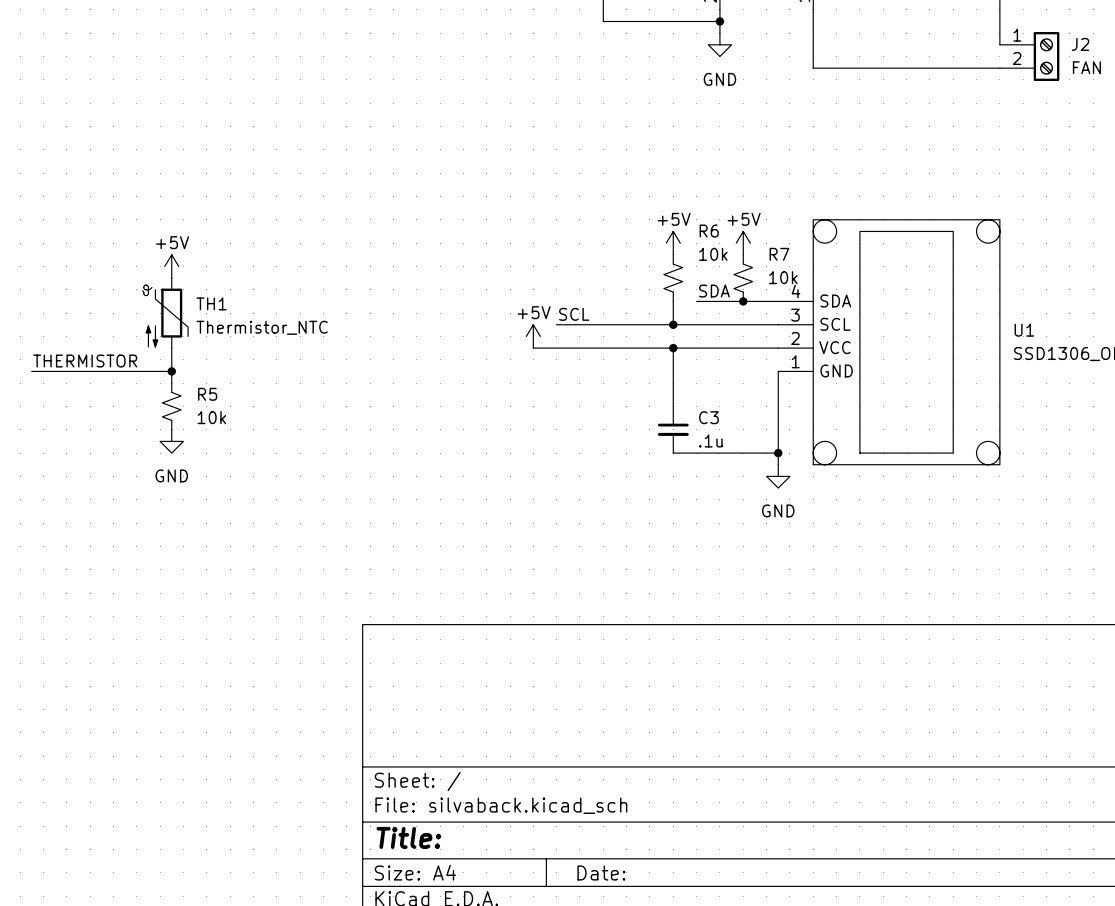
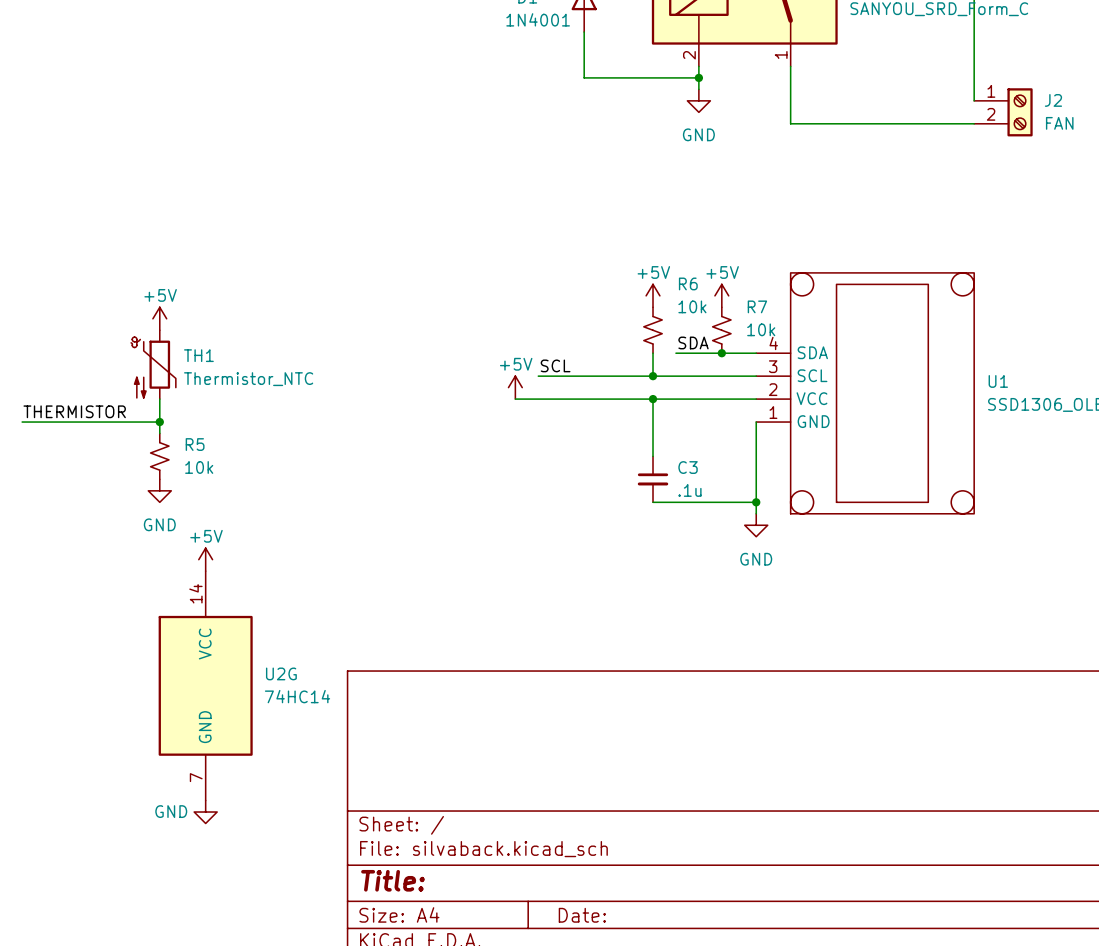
power symbol: none -> +5V (205, 559)
U2G: none -> 74HC14 (205, 685)
power symbol: none -> GND (205, 812)

